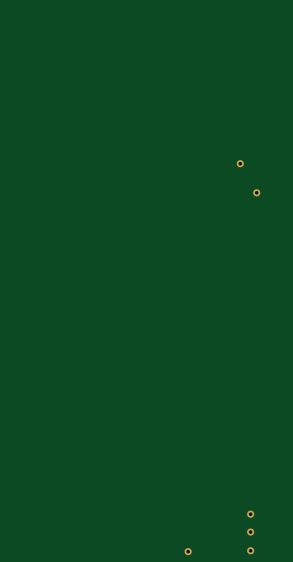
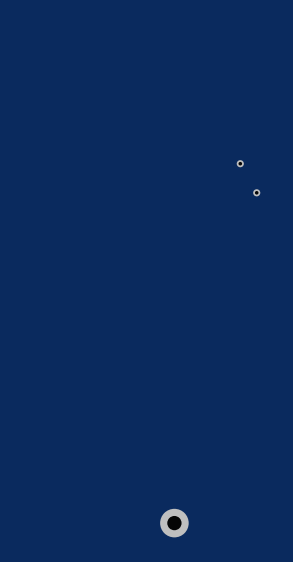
via: (250, 514) -> none
via: none -> (174, 523)
via: (250, 532) -> none
via: (250, 550) -> none
via: (188, 551) -> none

